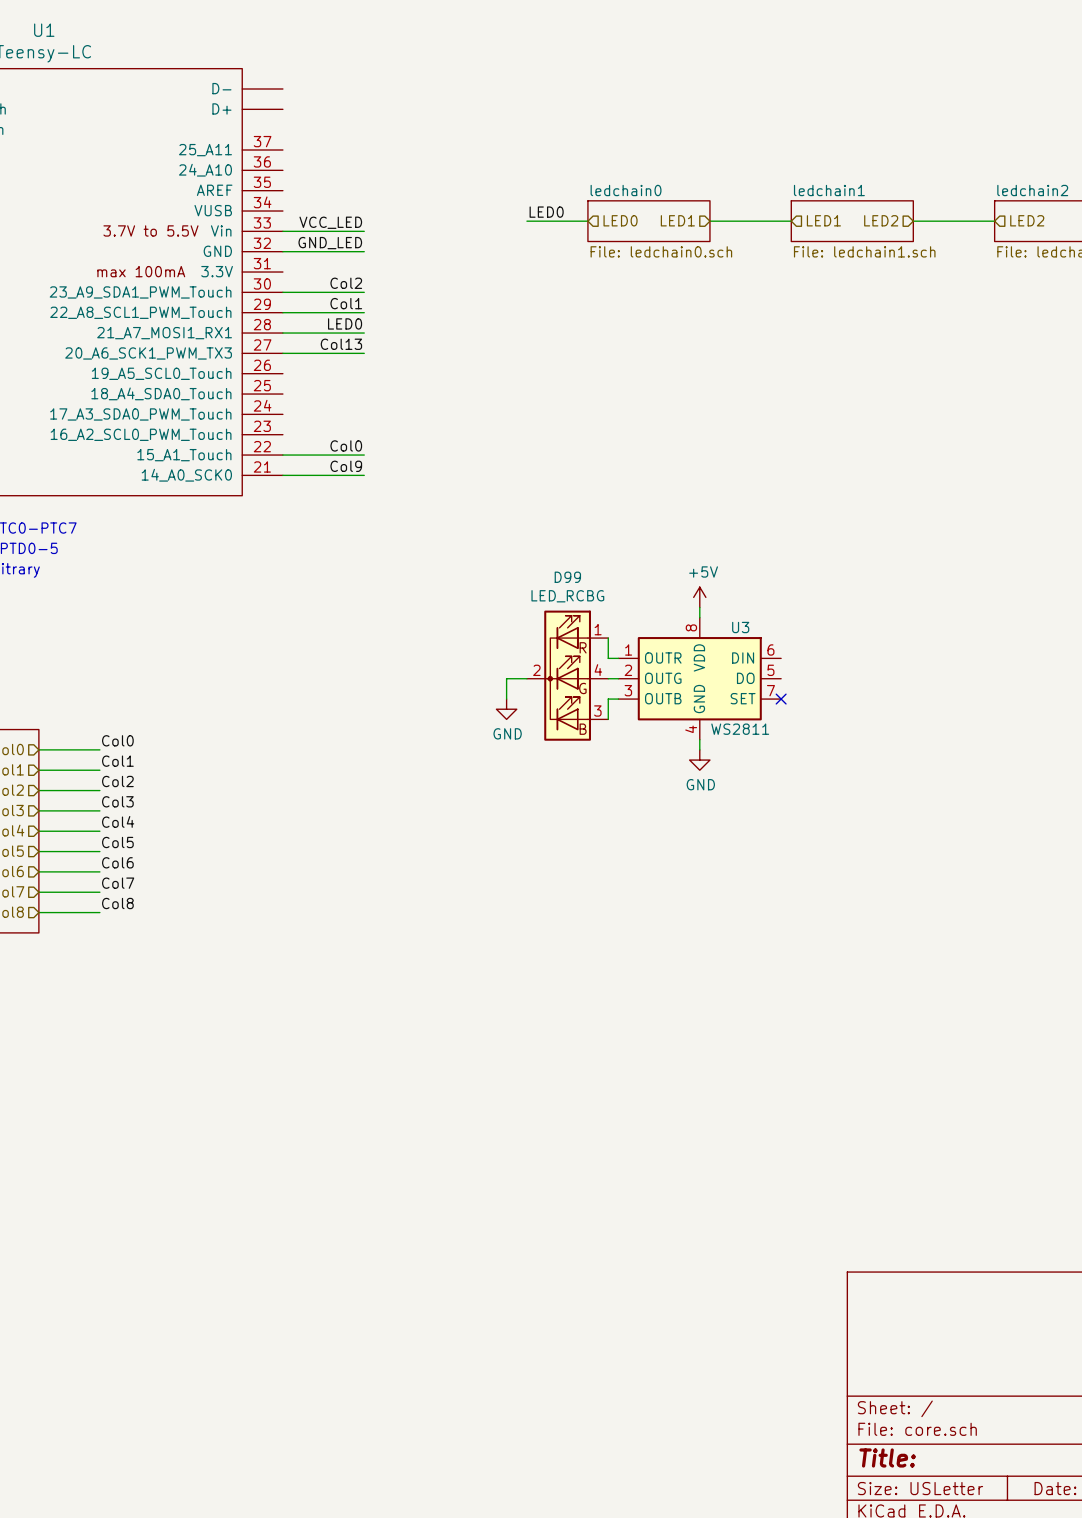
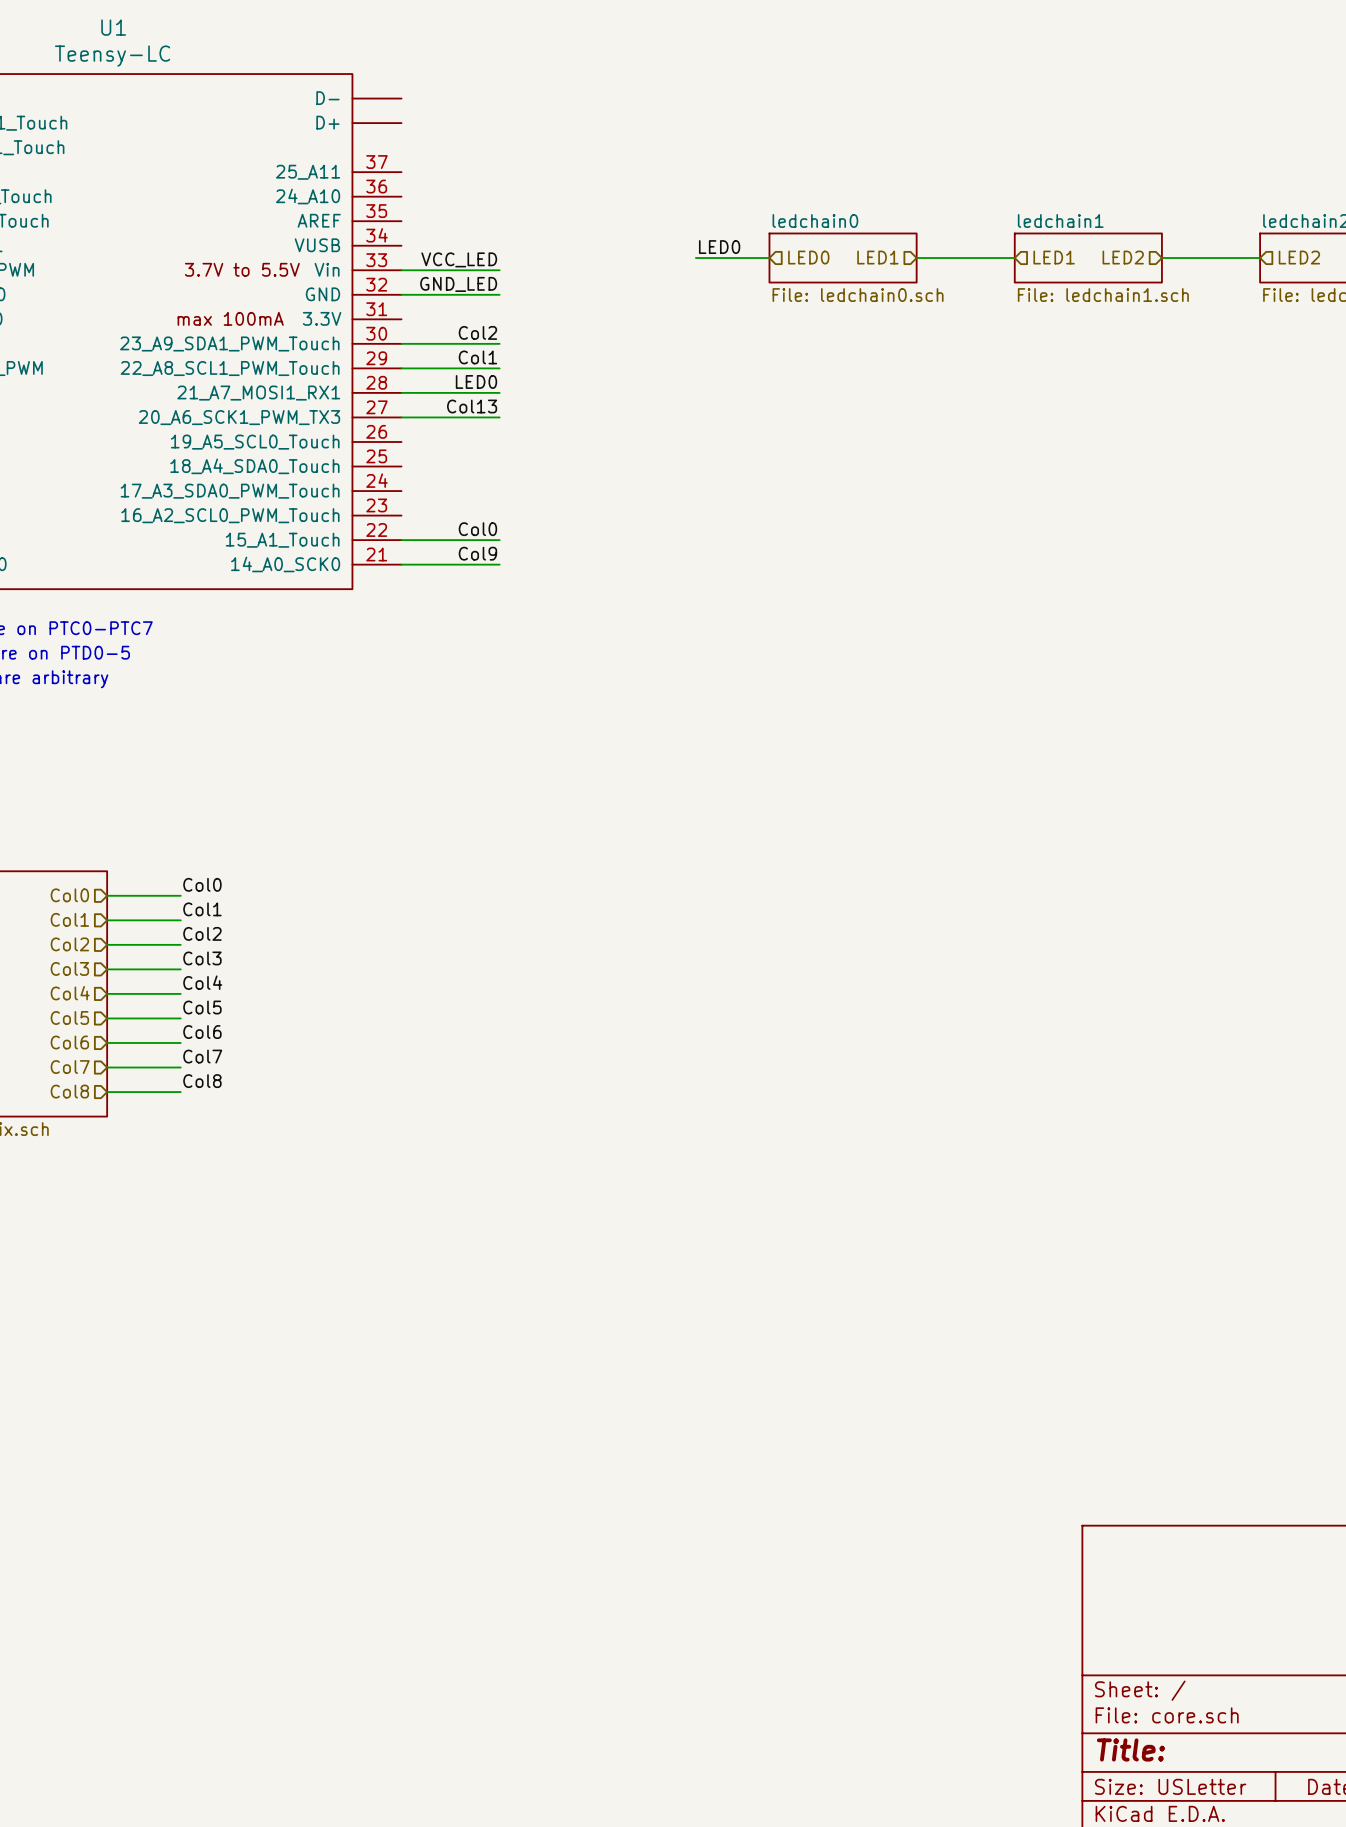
power symbol: +5V (699, 597) -> none
wire: (699, 607) (699, 617) -> none
wire: (608, 638) (608, 658) (618, 658) -> none
D99: LED_RCBG (567, 675) -> none
wire: (526, 678) (506, 678) (506, 699) -> none
wire: (608, 678) (618, 678) -> none
U3: WS2811 (699, 678) -> none
wire: (618, 699) (608, 699) (608, 719) -> none
no-connect mark: (781, 699) -> none
power symbol: GND (506, 709) -> none
wire: (699, 739) (699, 749) -> none
power symbol: GND (699, 760) -> none

